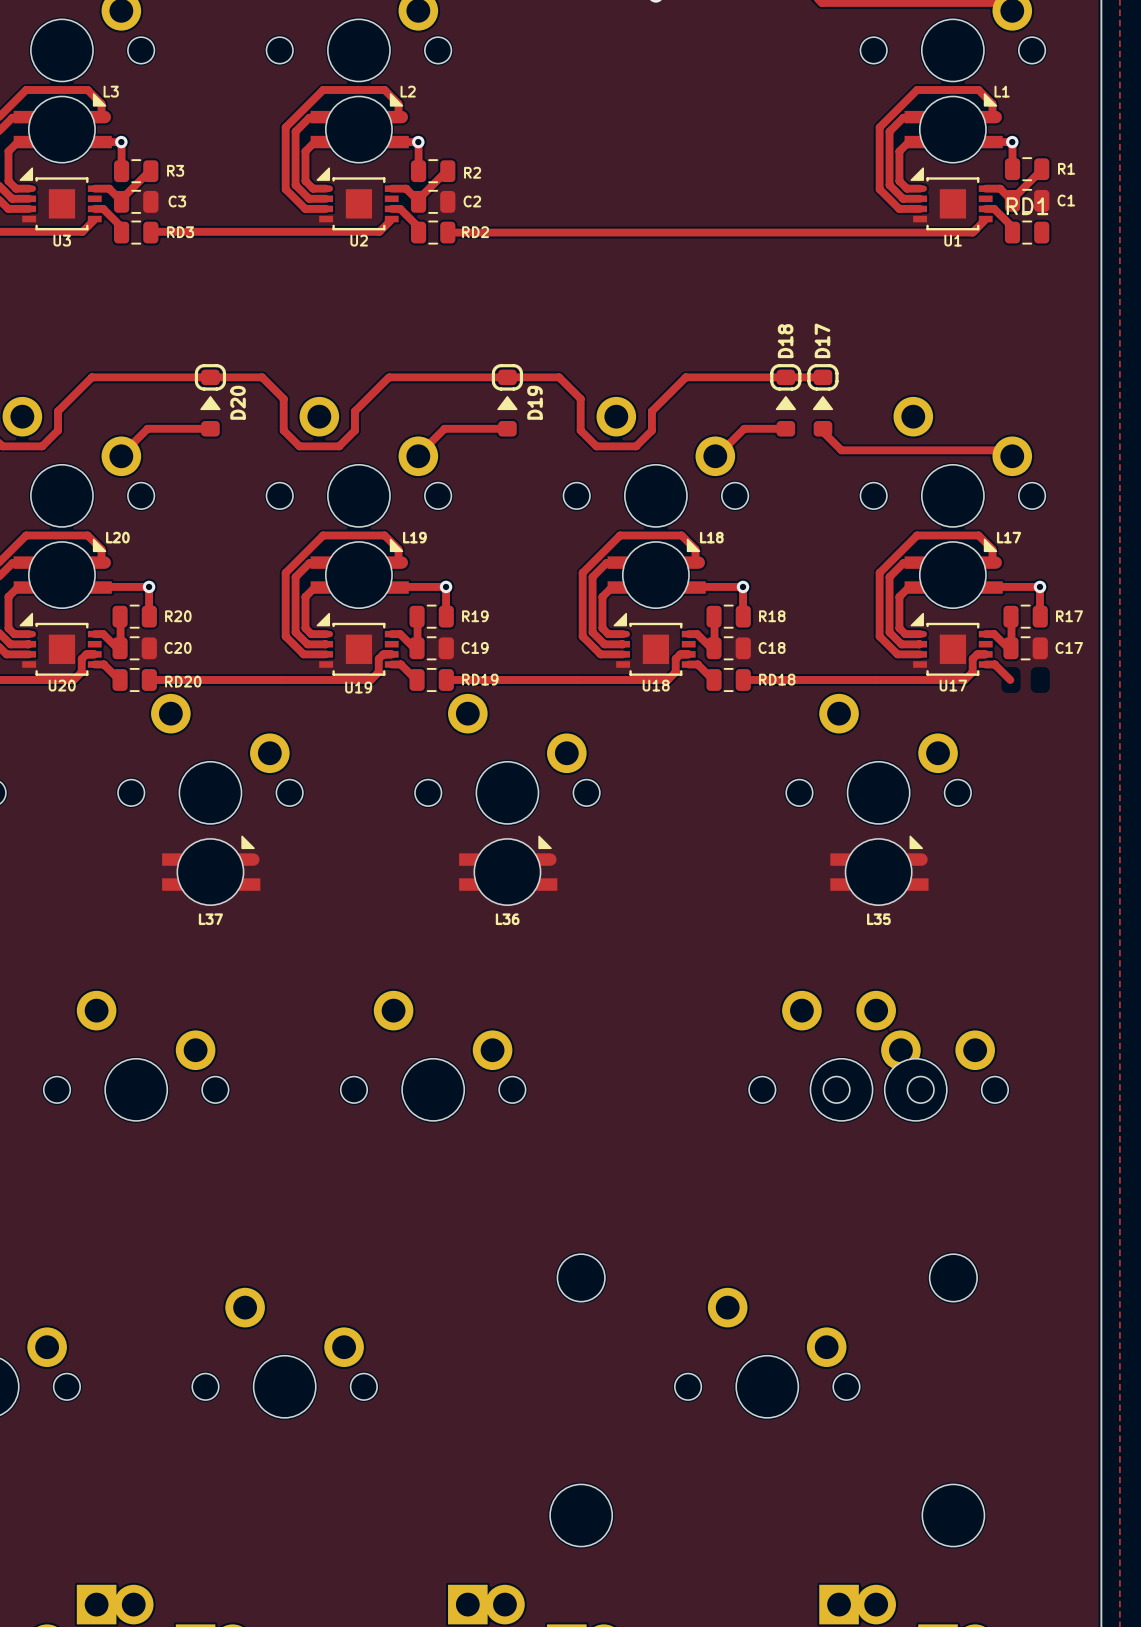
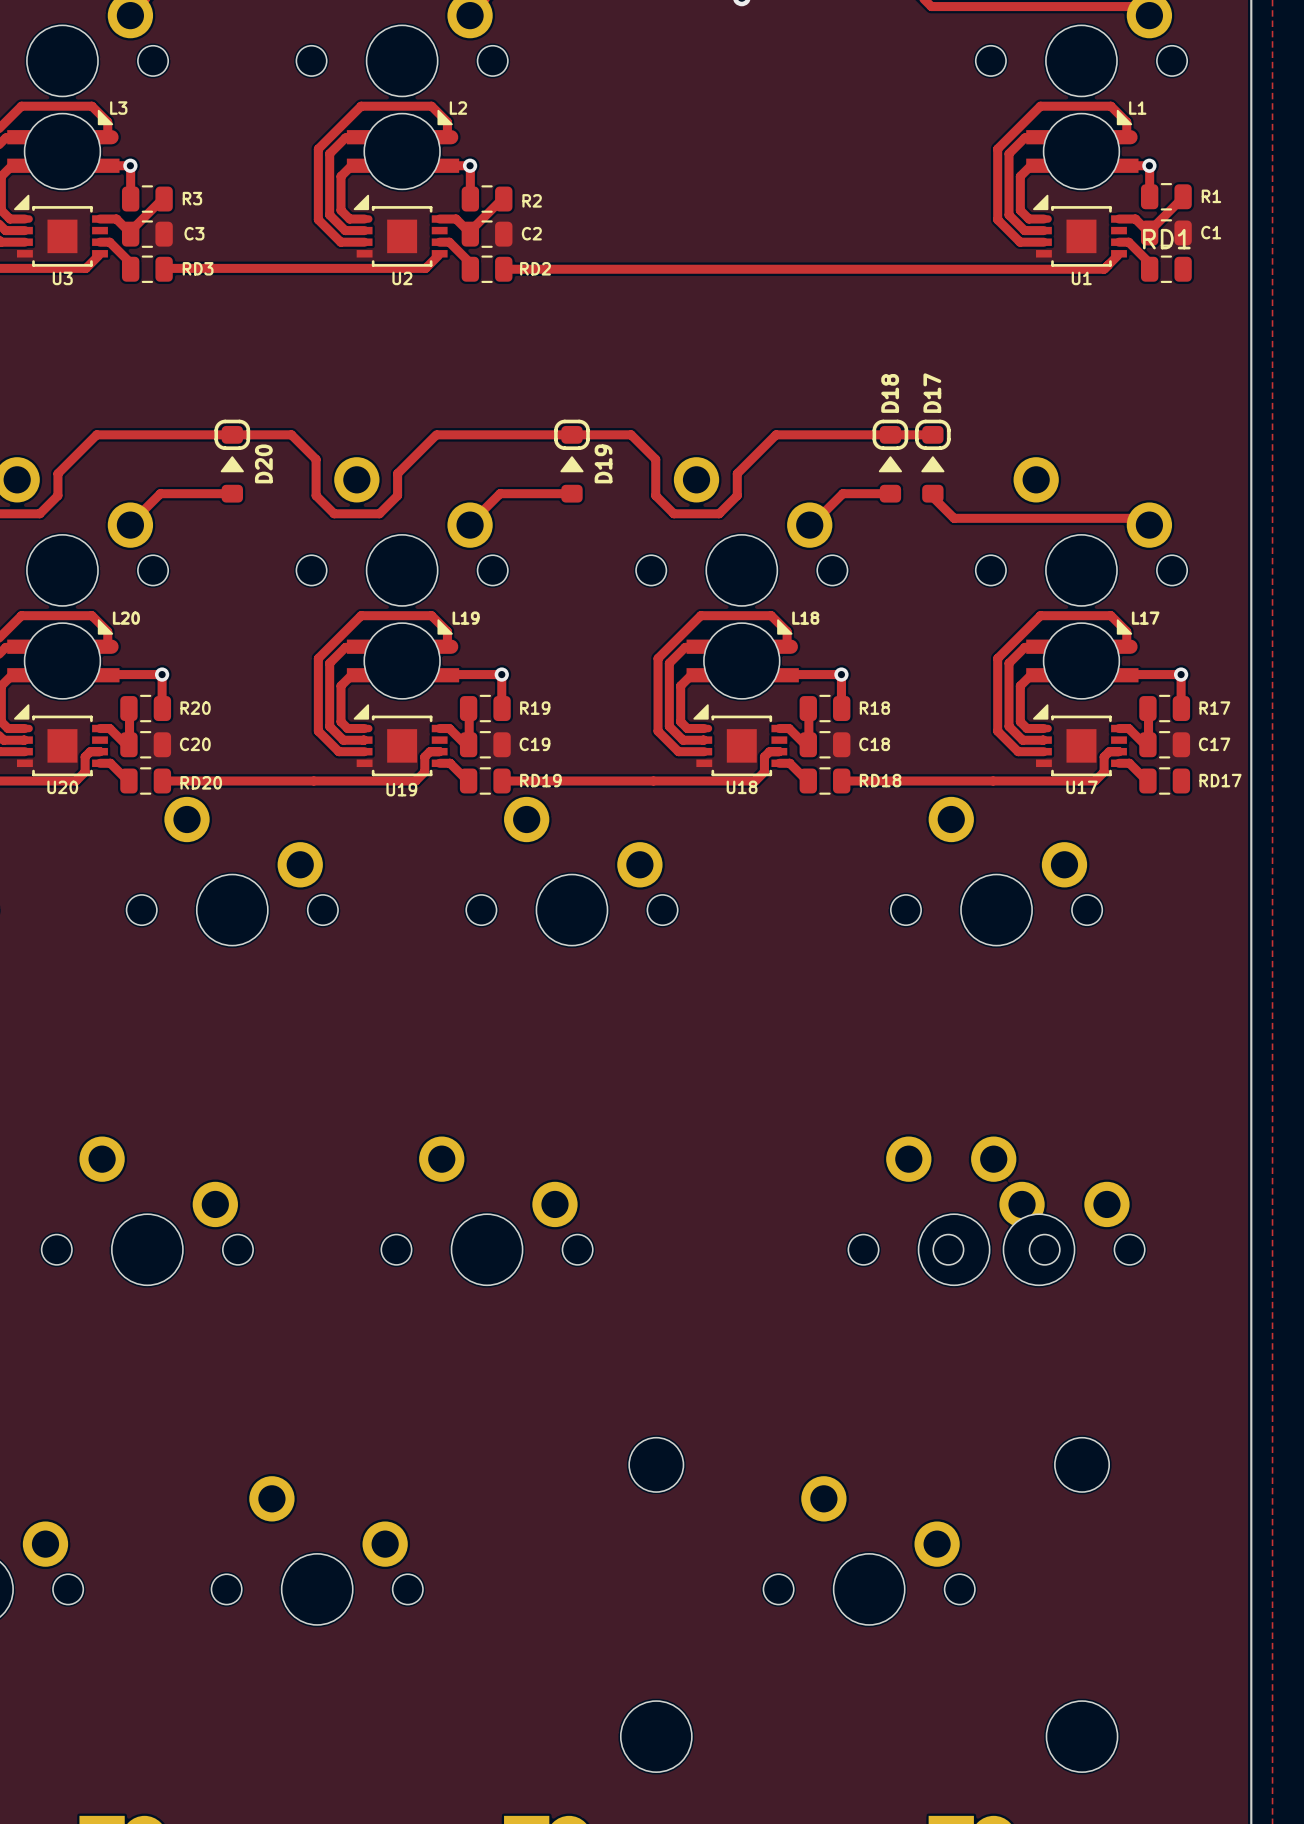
RD17: none -> (1164, 781)
L37: (211, 870) -> none
L36: (508, 870) -> none
L35: (879, 870) -> none

